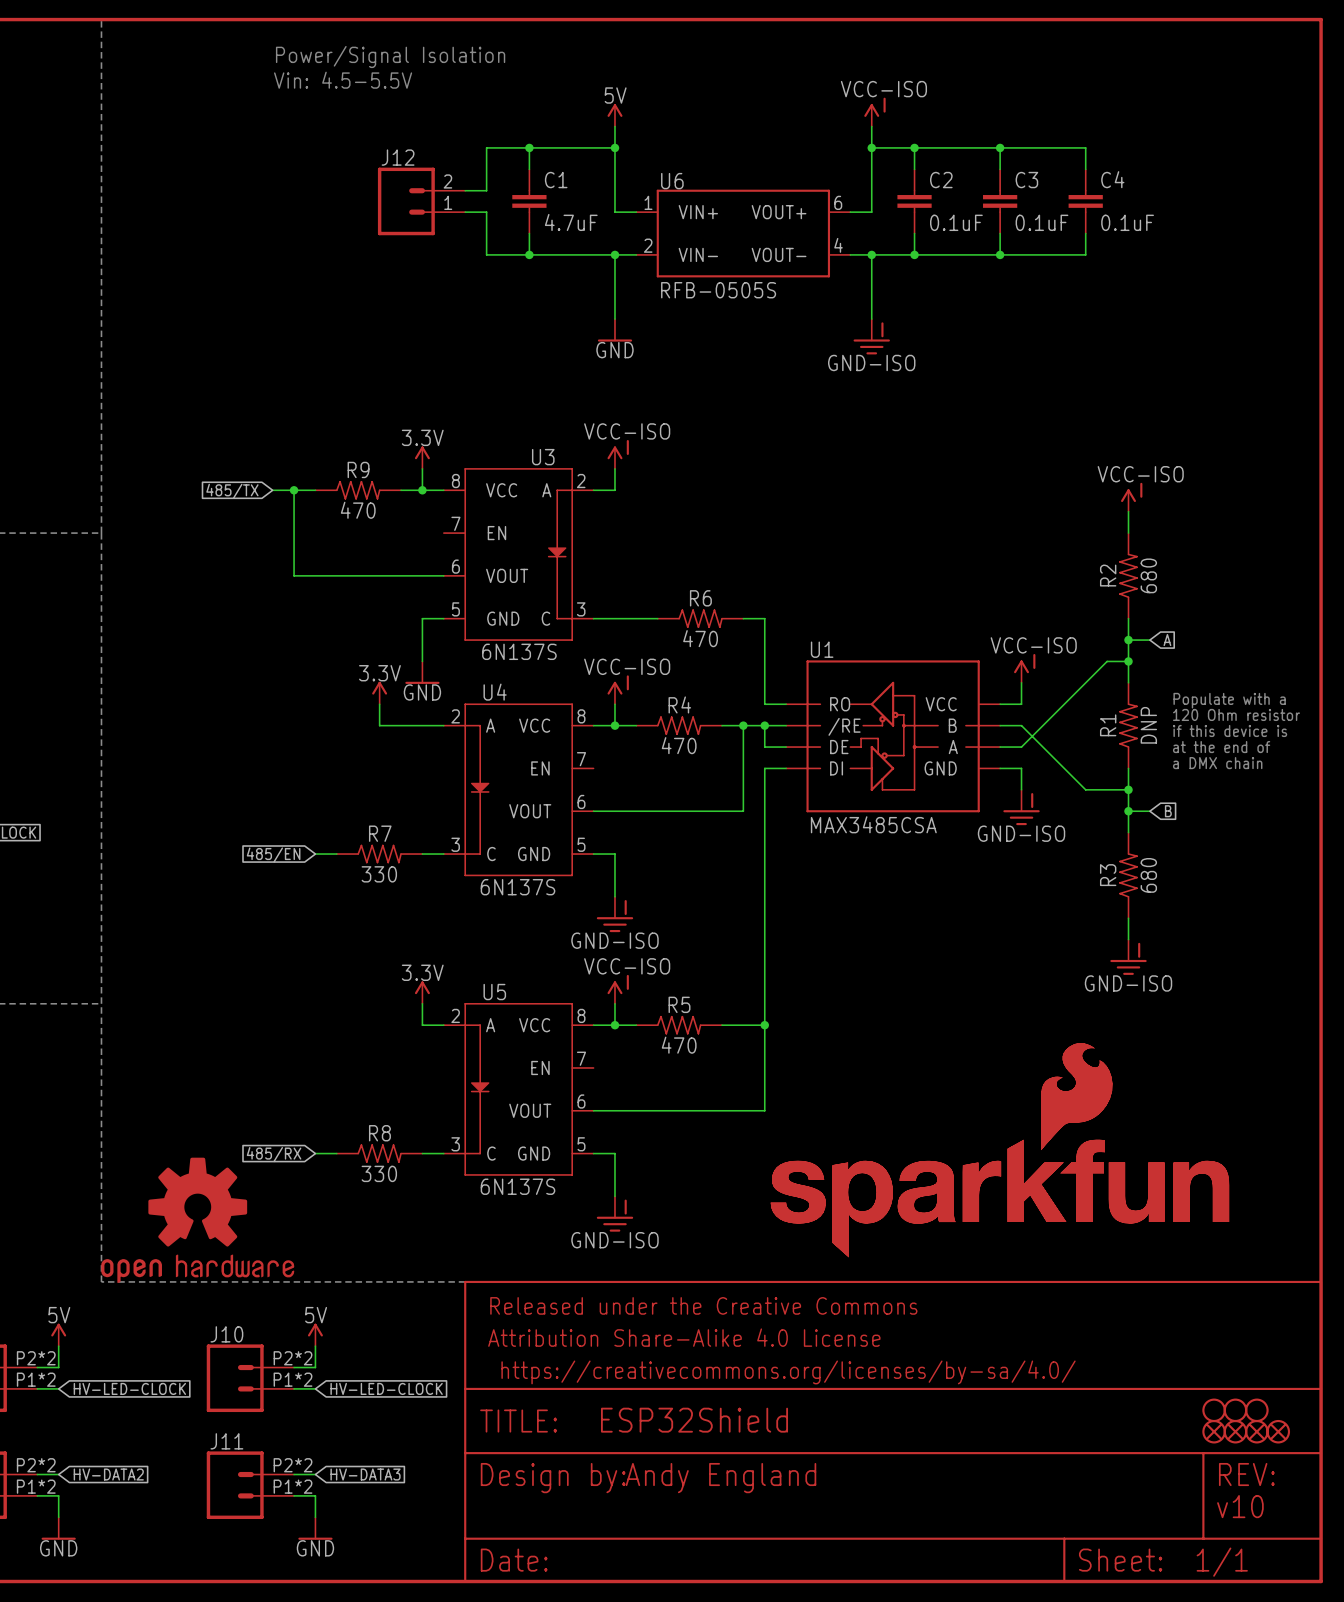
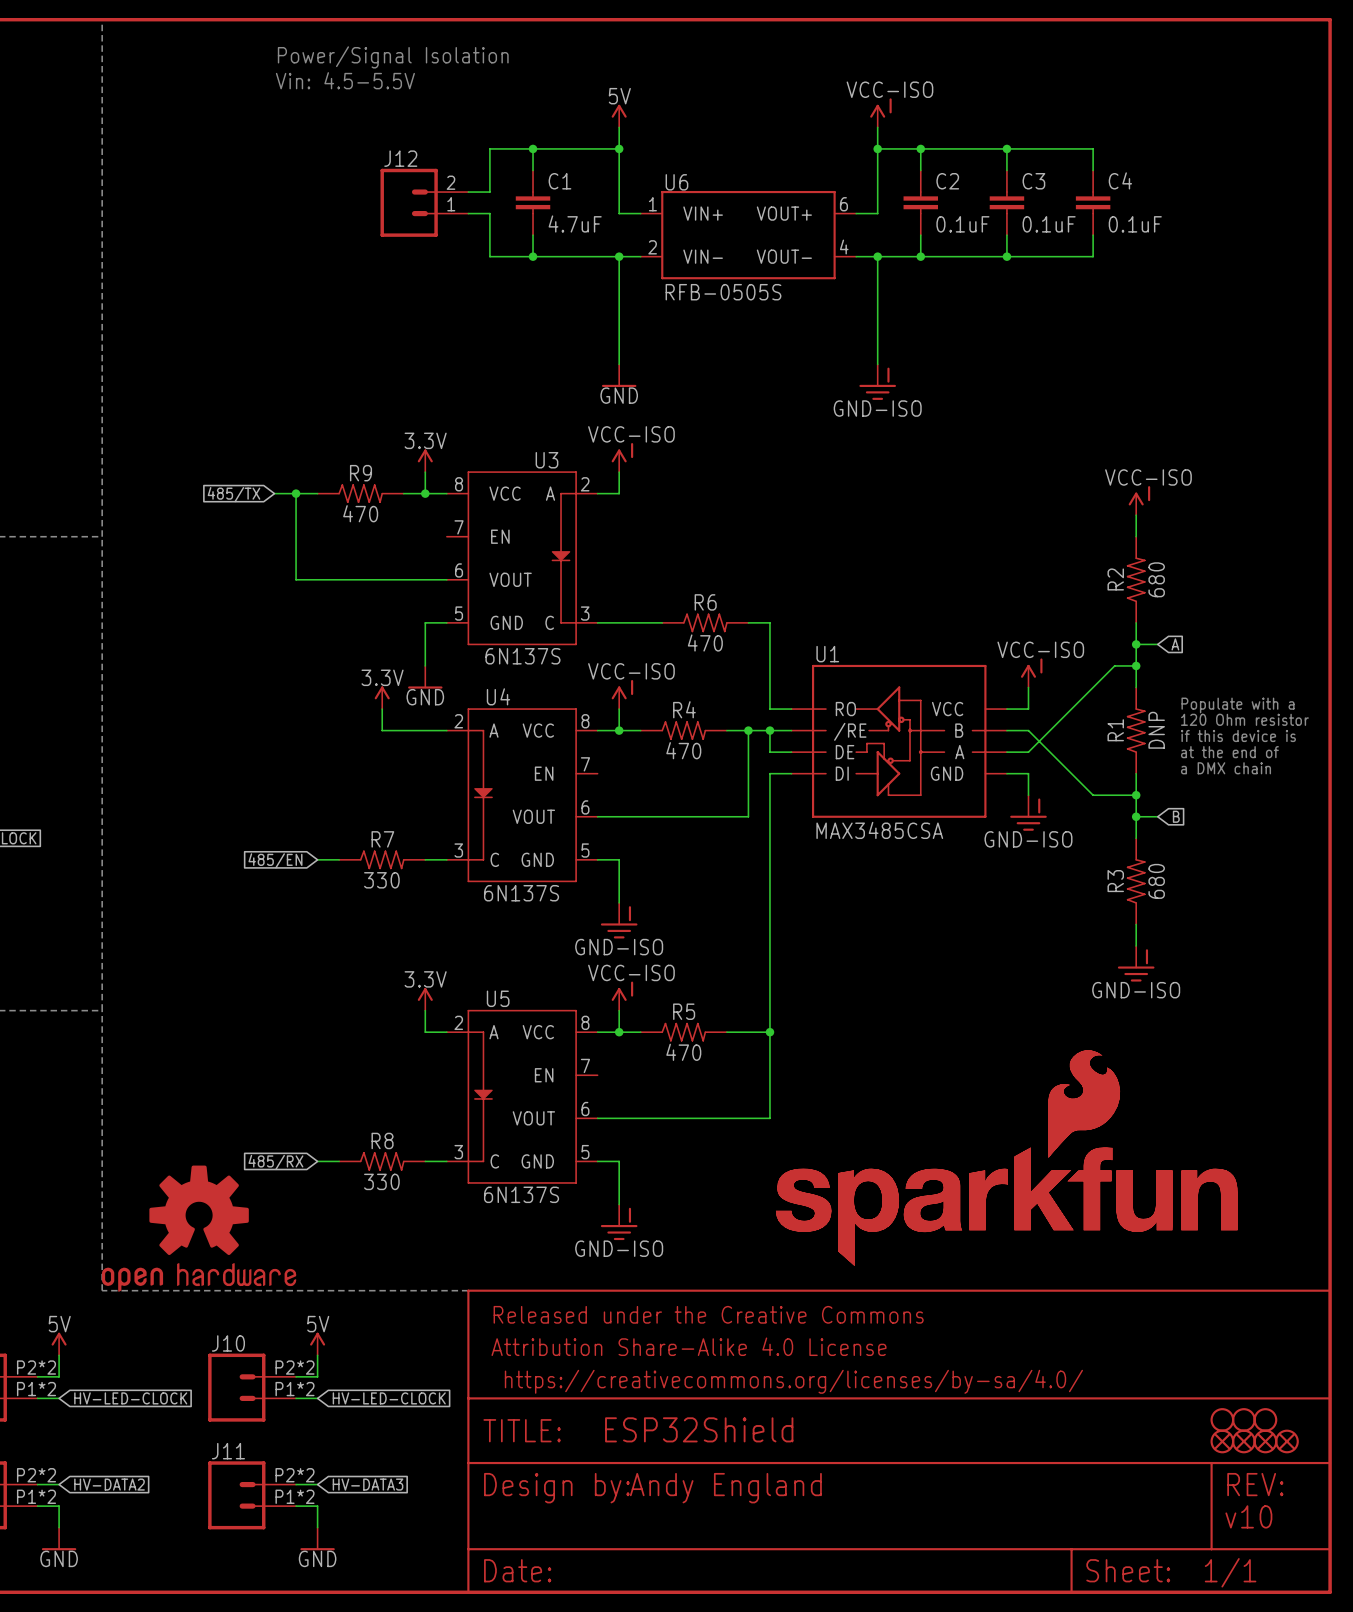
power symbol position: GND (614, 330) -> GND (619, 375)
power symbol position: GND-ISO (871, 336) -> GND-ISO (877, 382)

